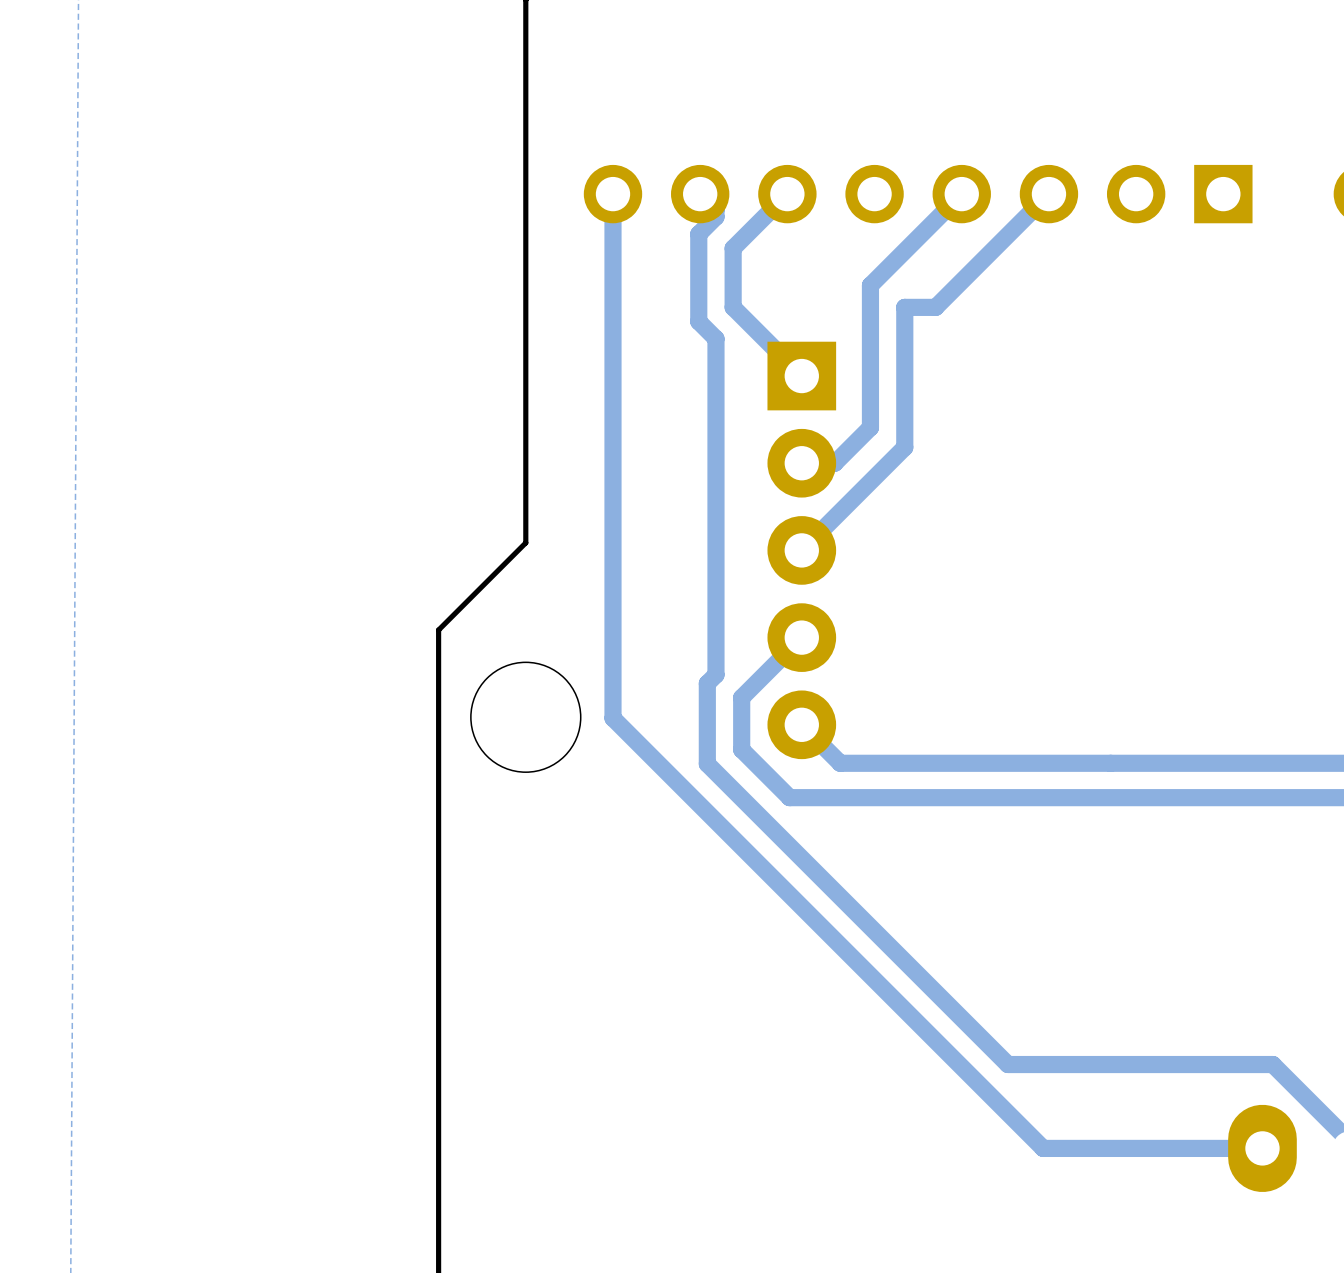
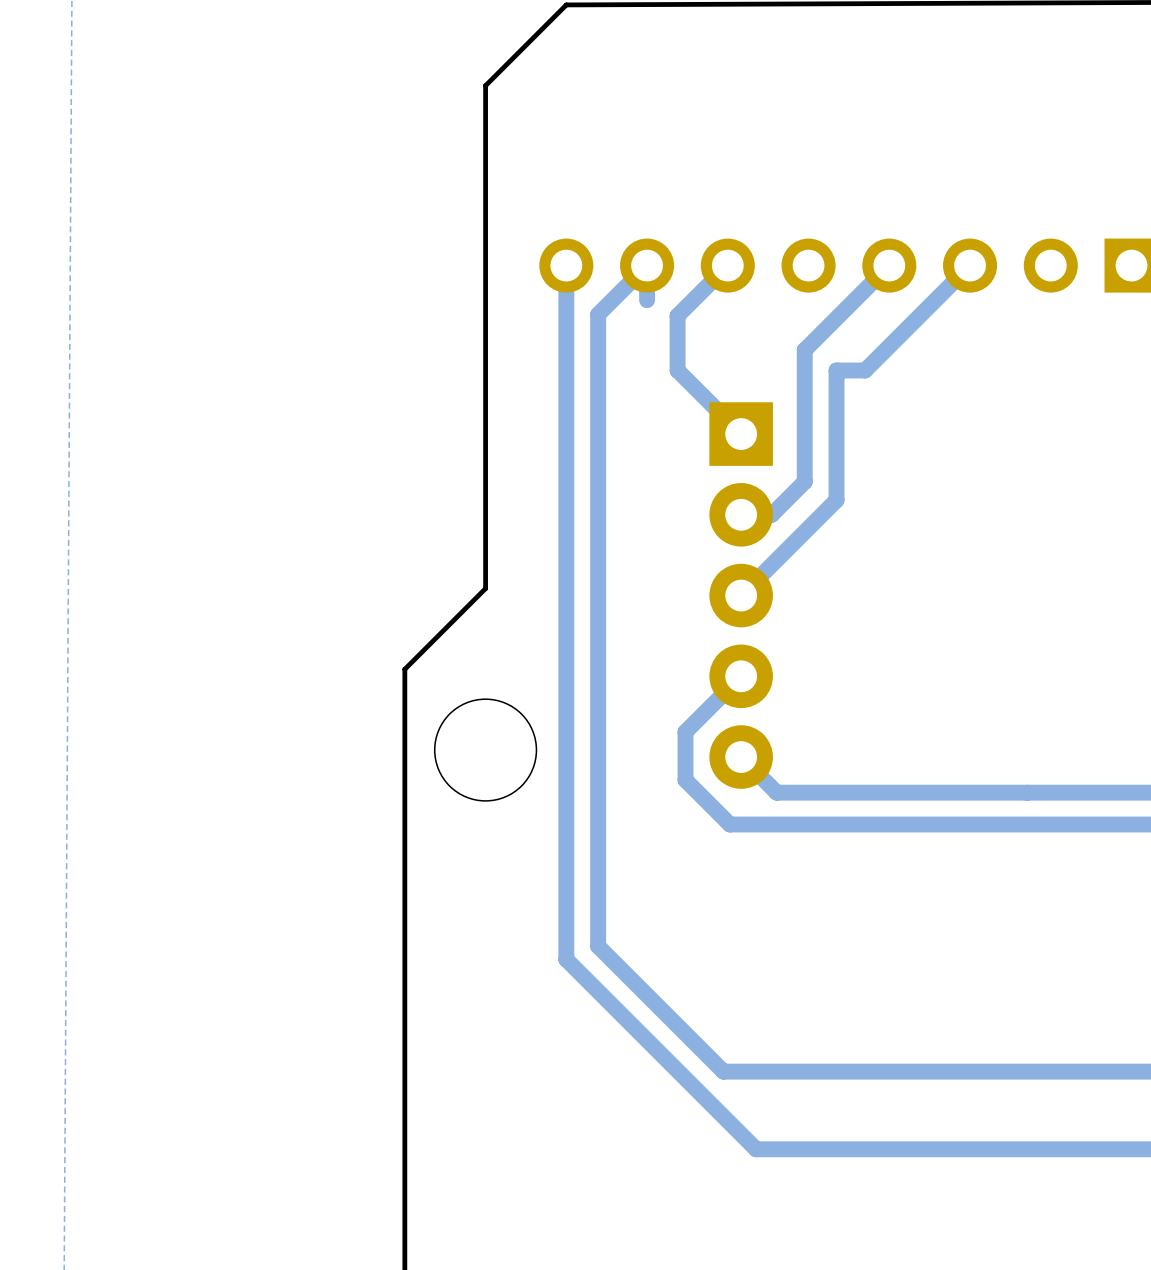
track: (700, 194) (715, 209) (715, 216) (698, 234) (698, 321) (715, 338) (715, 674) (707, 683) (707, 763) (1007, 1064) -> (647, 300) (647, 265) (598, 314) (598, 946) (723, 1071) (932, 1071)
track: (612, 718) (1043, 1148) -> (566, 750) (566, 959) (756, 1149) (964, 1149)

